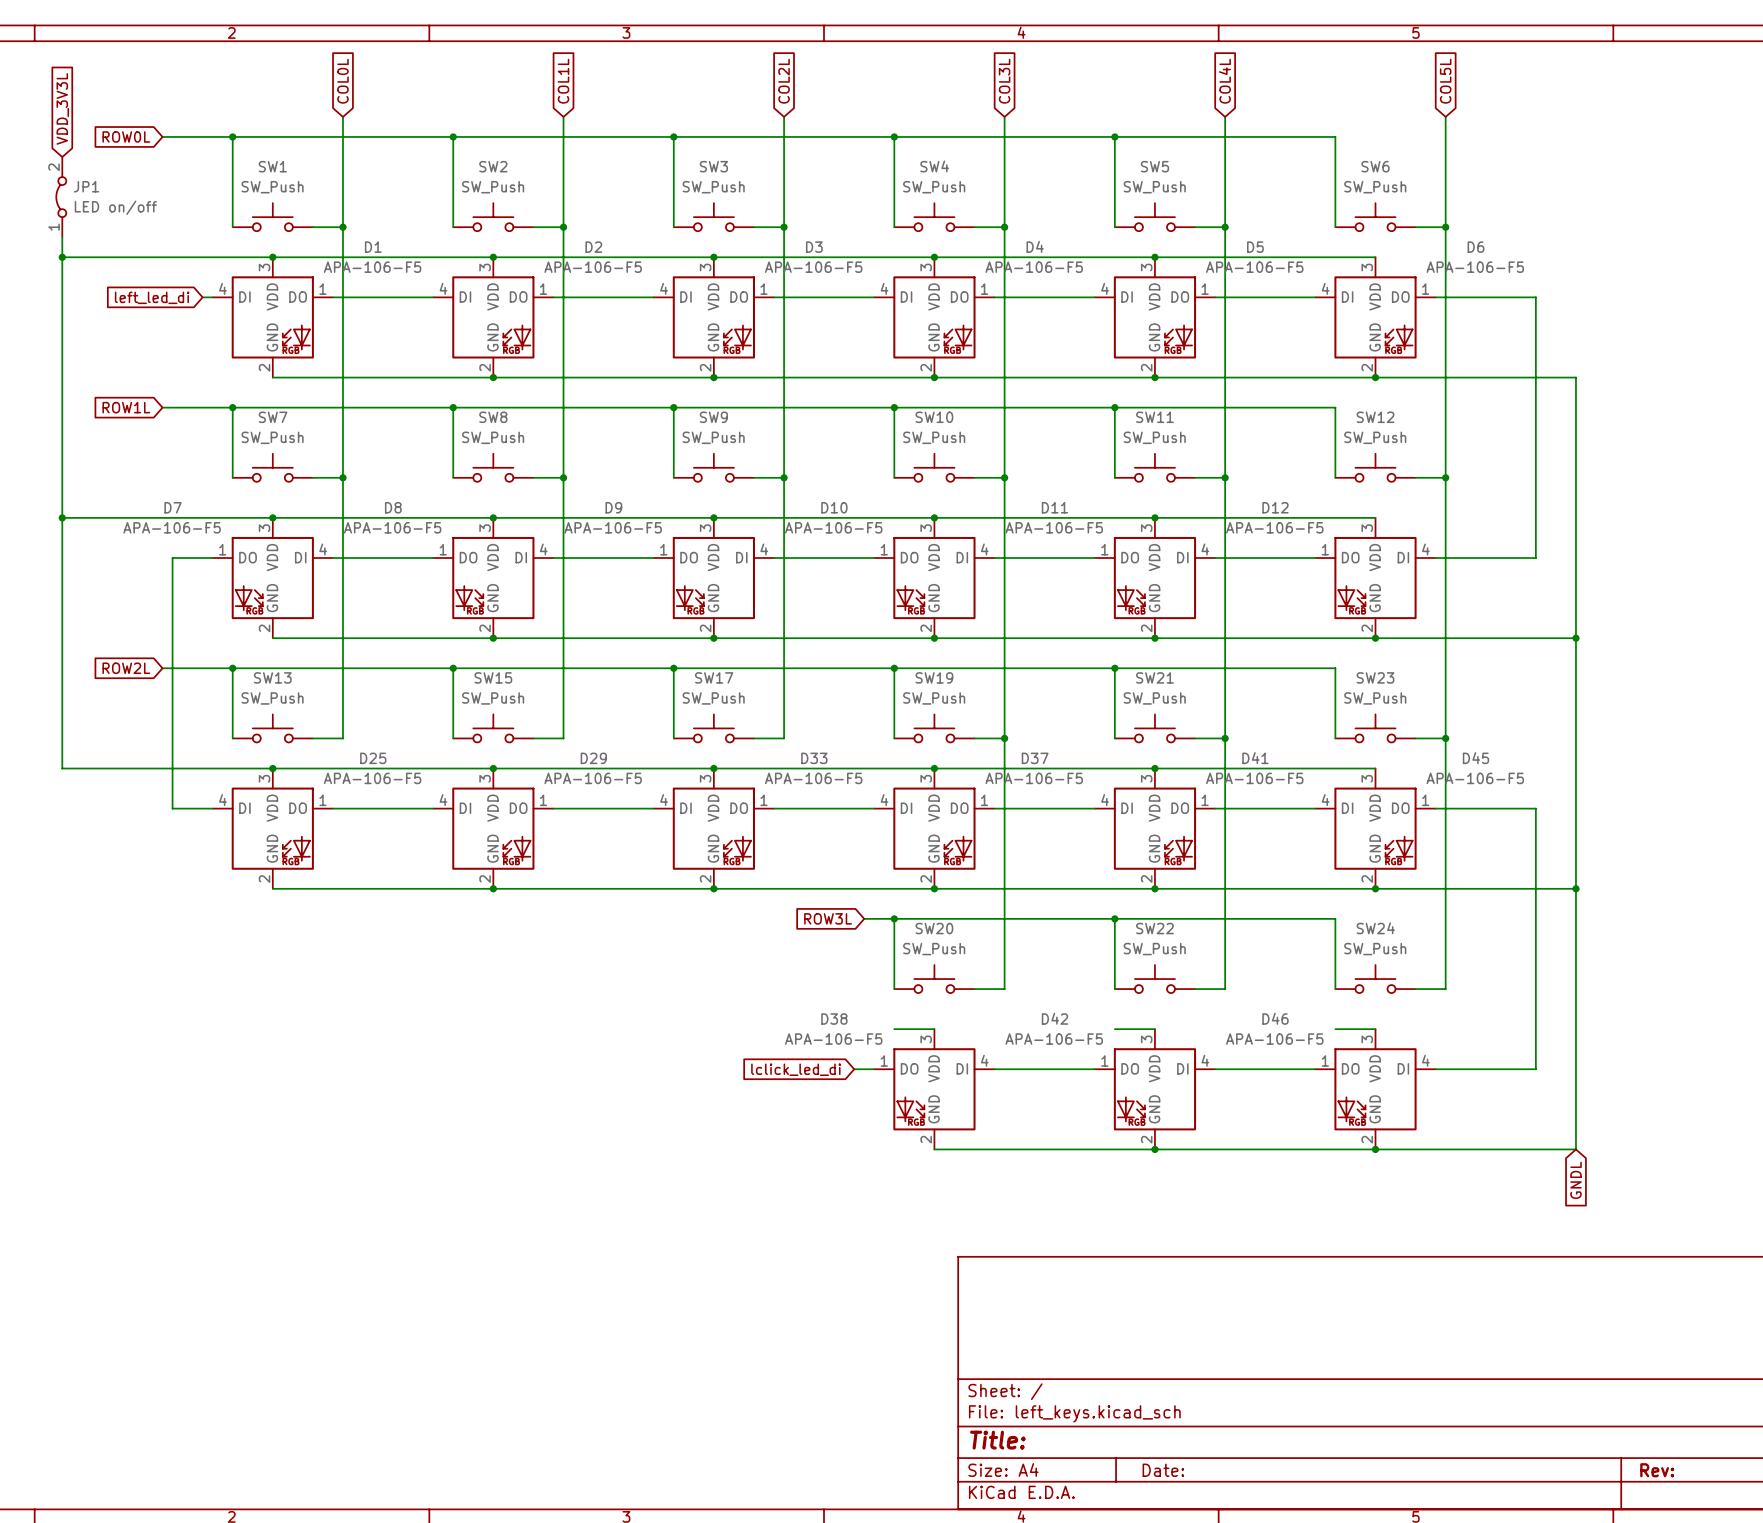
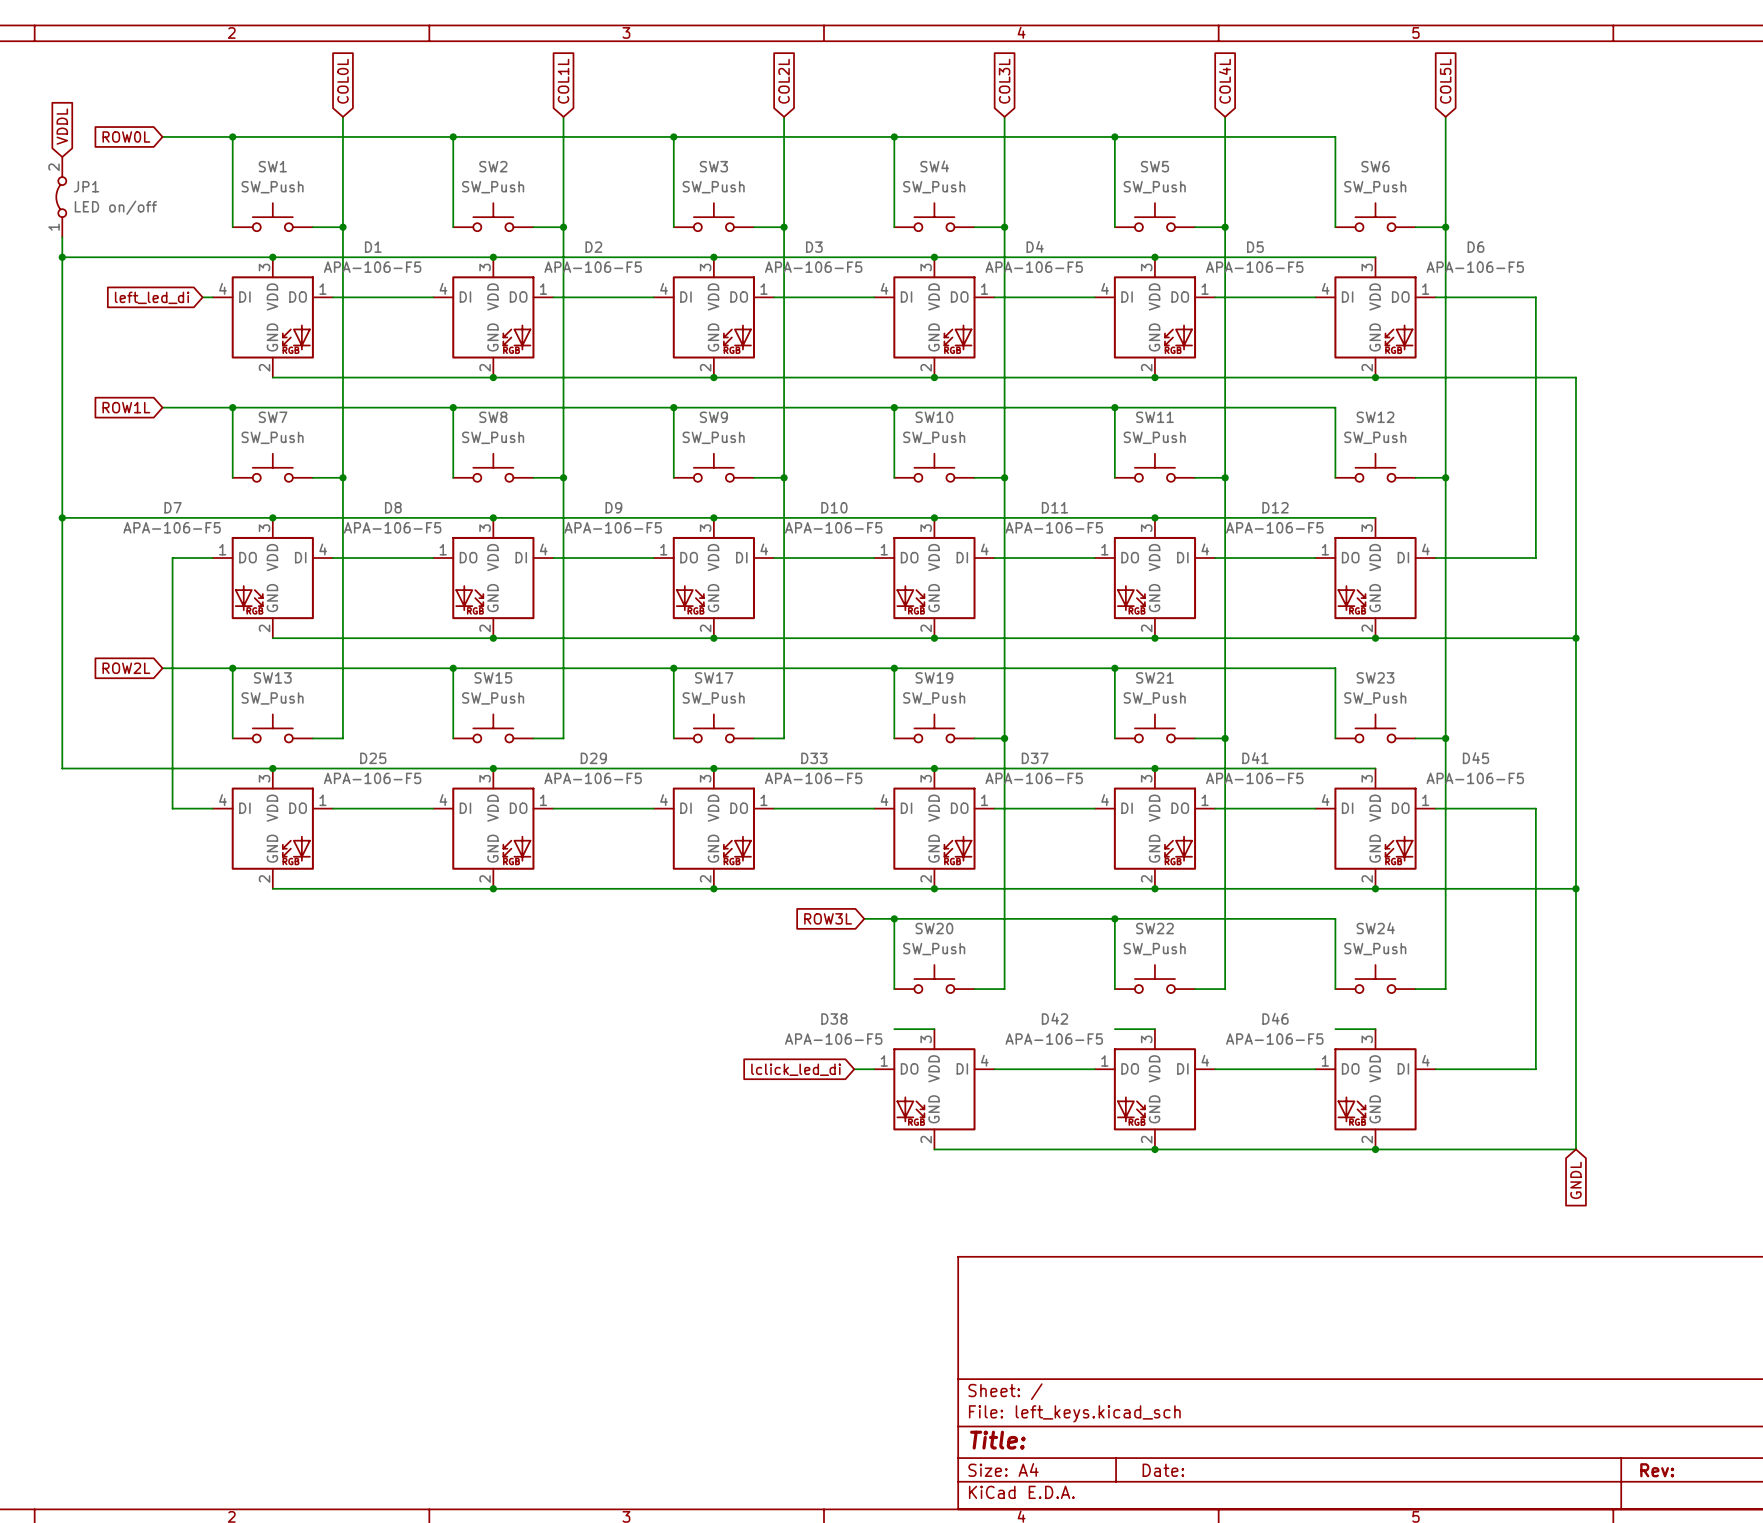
global label: VDD_3V3L (62, 108) -> VDDL (62, 126)

